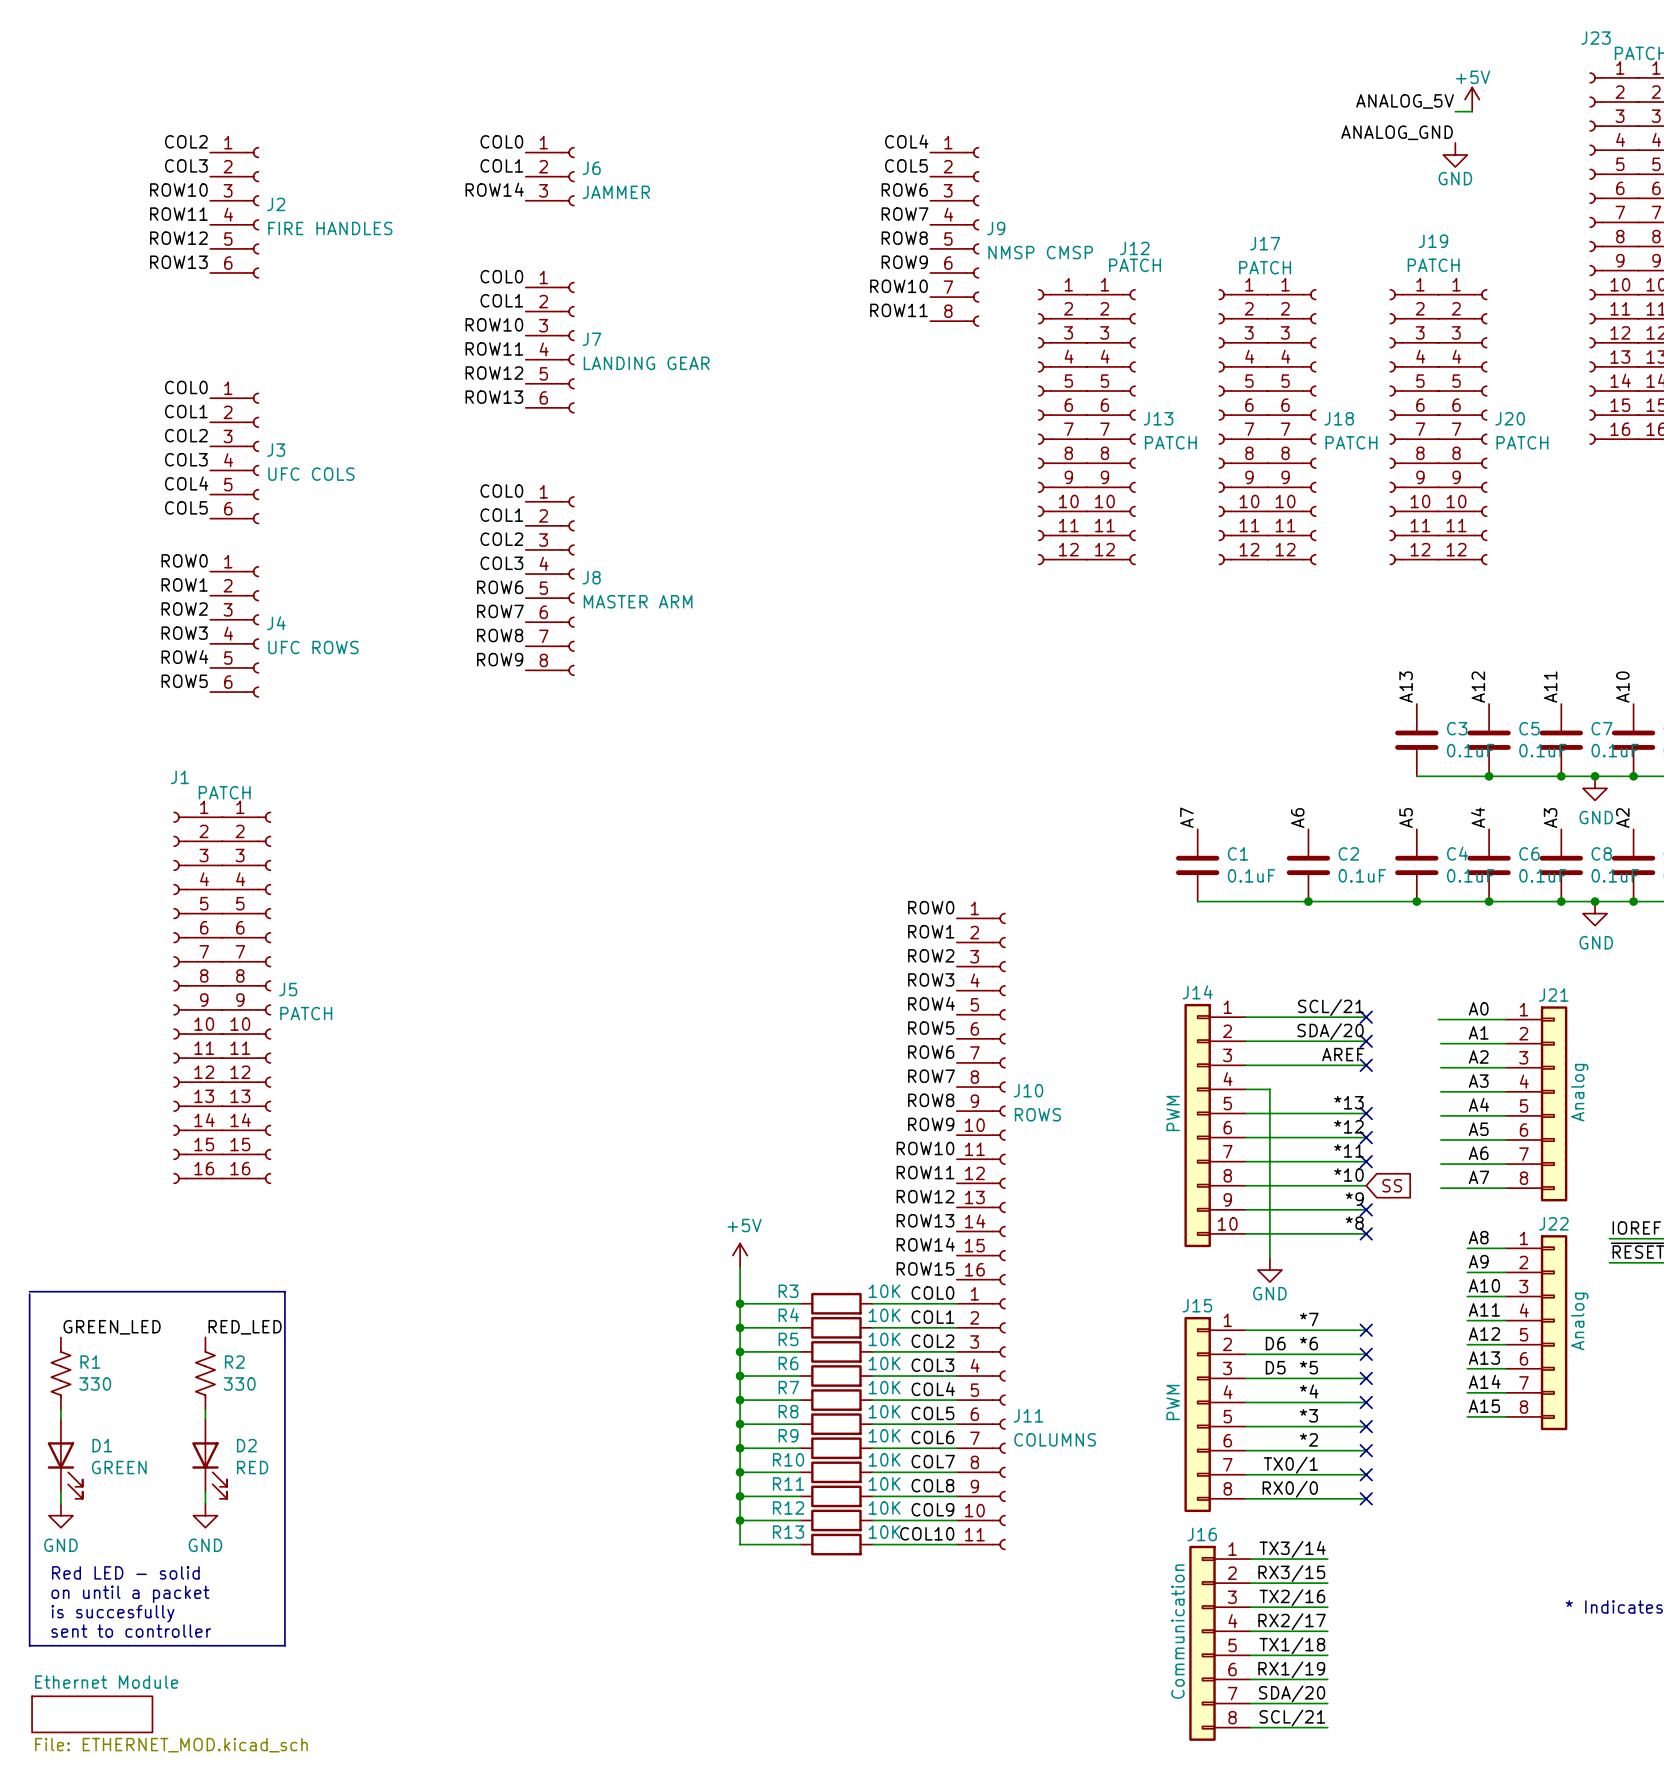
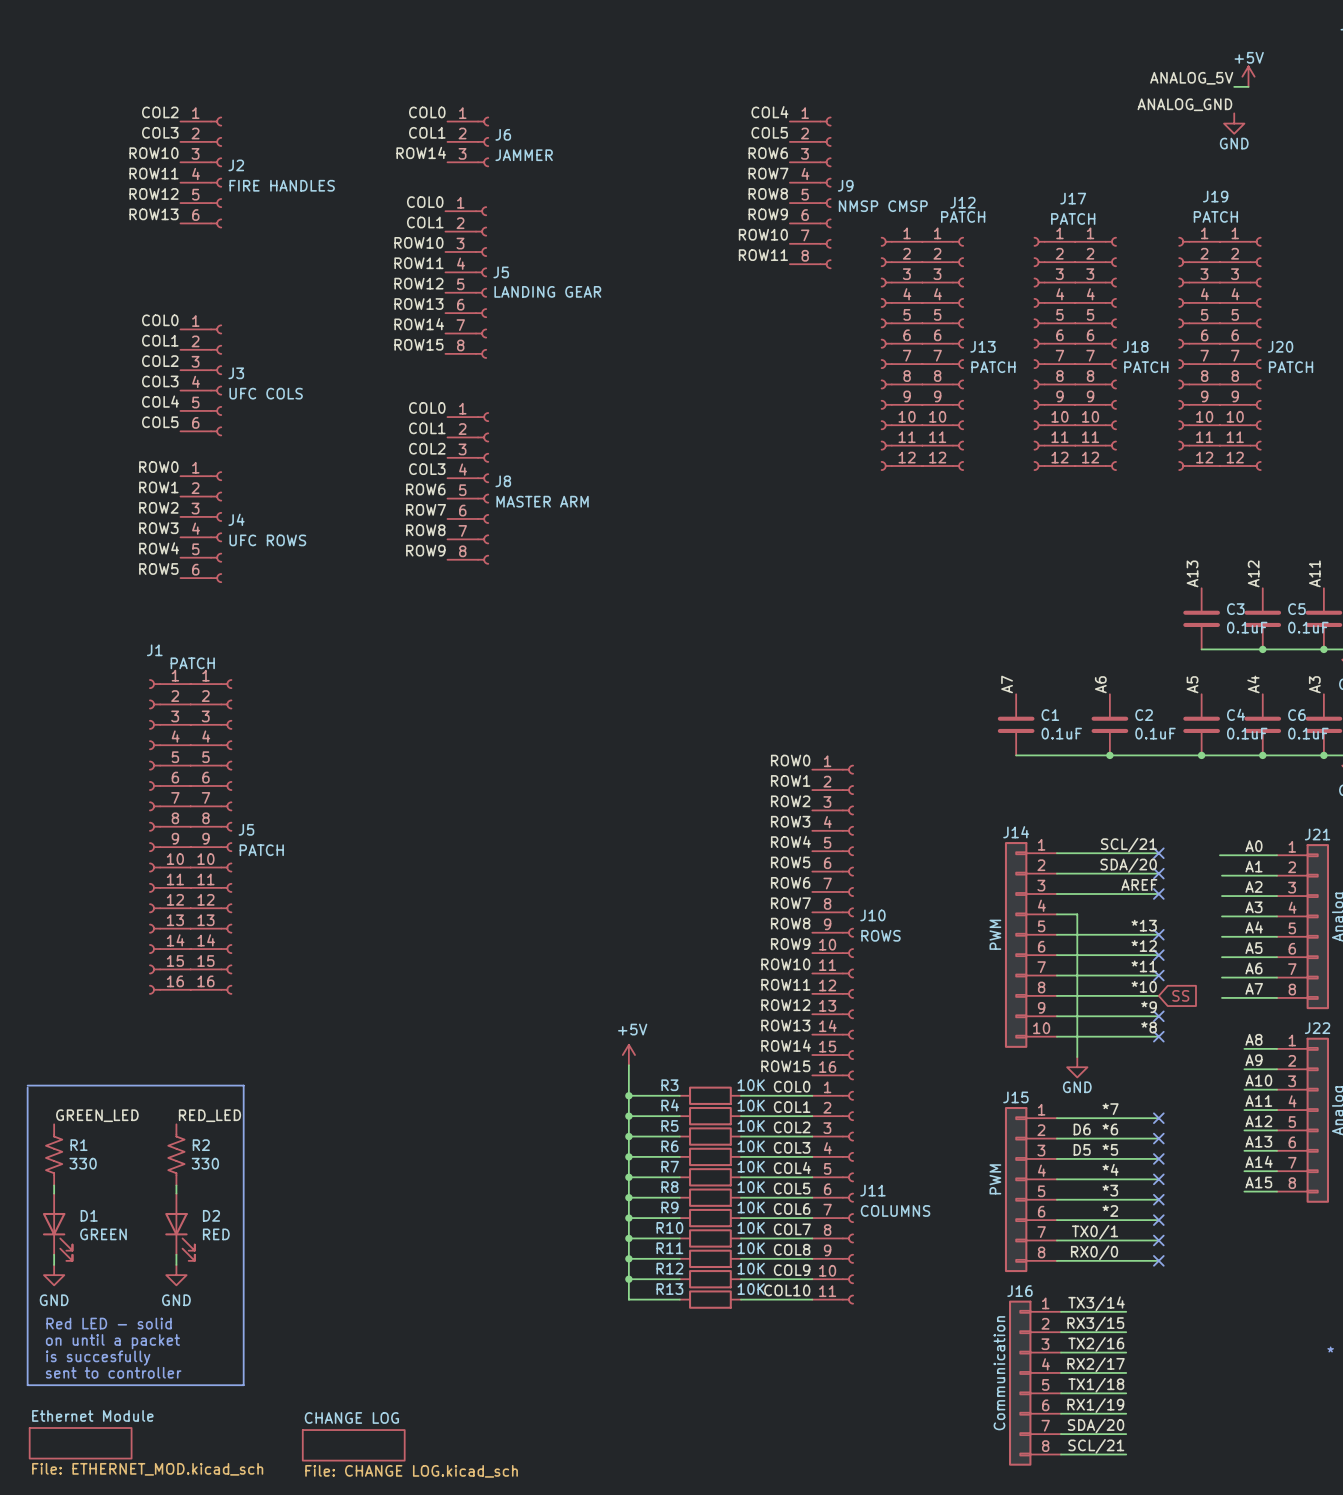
label: none -> COL0 (425, 202)
label: COL0 (501, 276) -> COL1 (425, 222)
label: COL1 (501, 300) -> ROW10 (418, 242)
label: ROW10 (494, 324) -> ROW11 (418, 263)
J5: none -> LANDING GEAR (466, 282)
J7: LANDING GEAR (550, 347) -> none
label: ROW11 (494, 348) -> ROW12 (418, 283)
label: ROW12 (494, 373) -> ROW13 (418, 304)
label: ROW13 (494, 397) -> ROW14 (419, 324)
label: none -> ROW15 (418, 344)
sheet CHANGE LOG: none -> File: CHANGE LOG.kicad_sch (353, 1445)

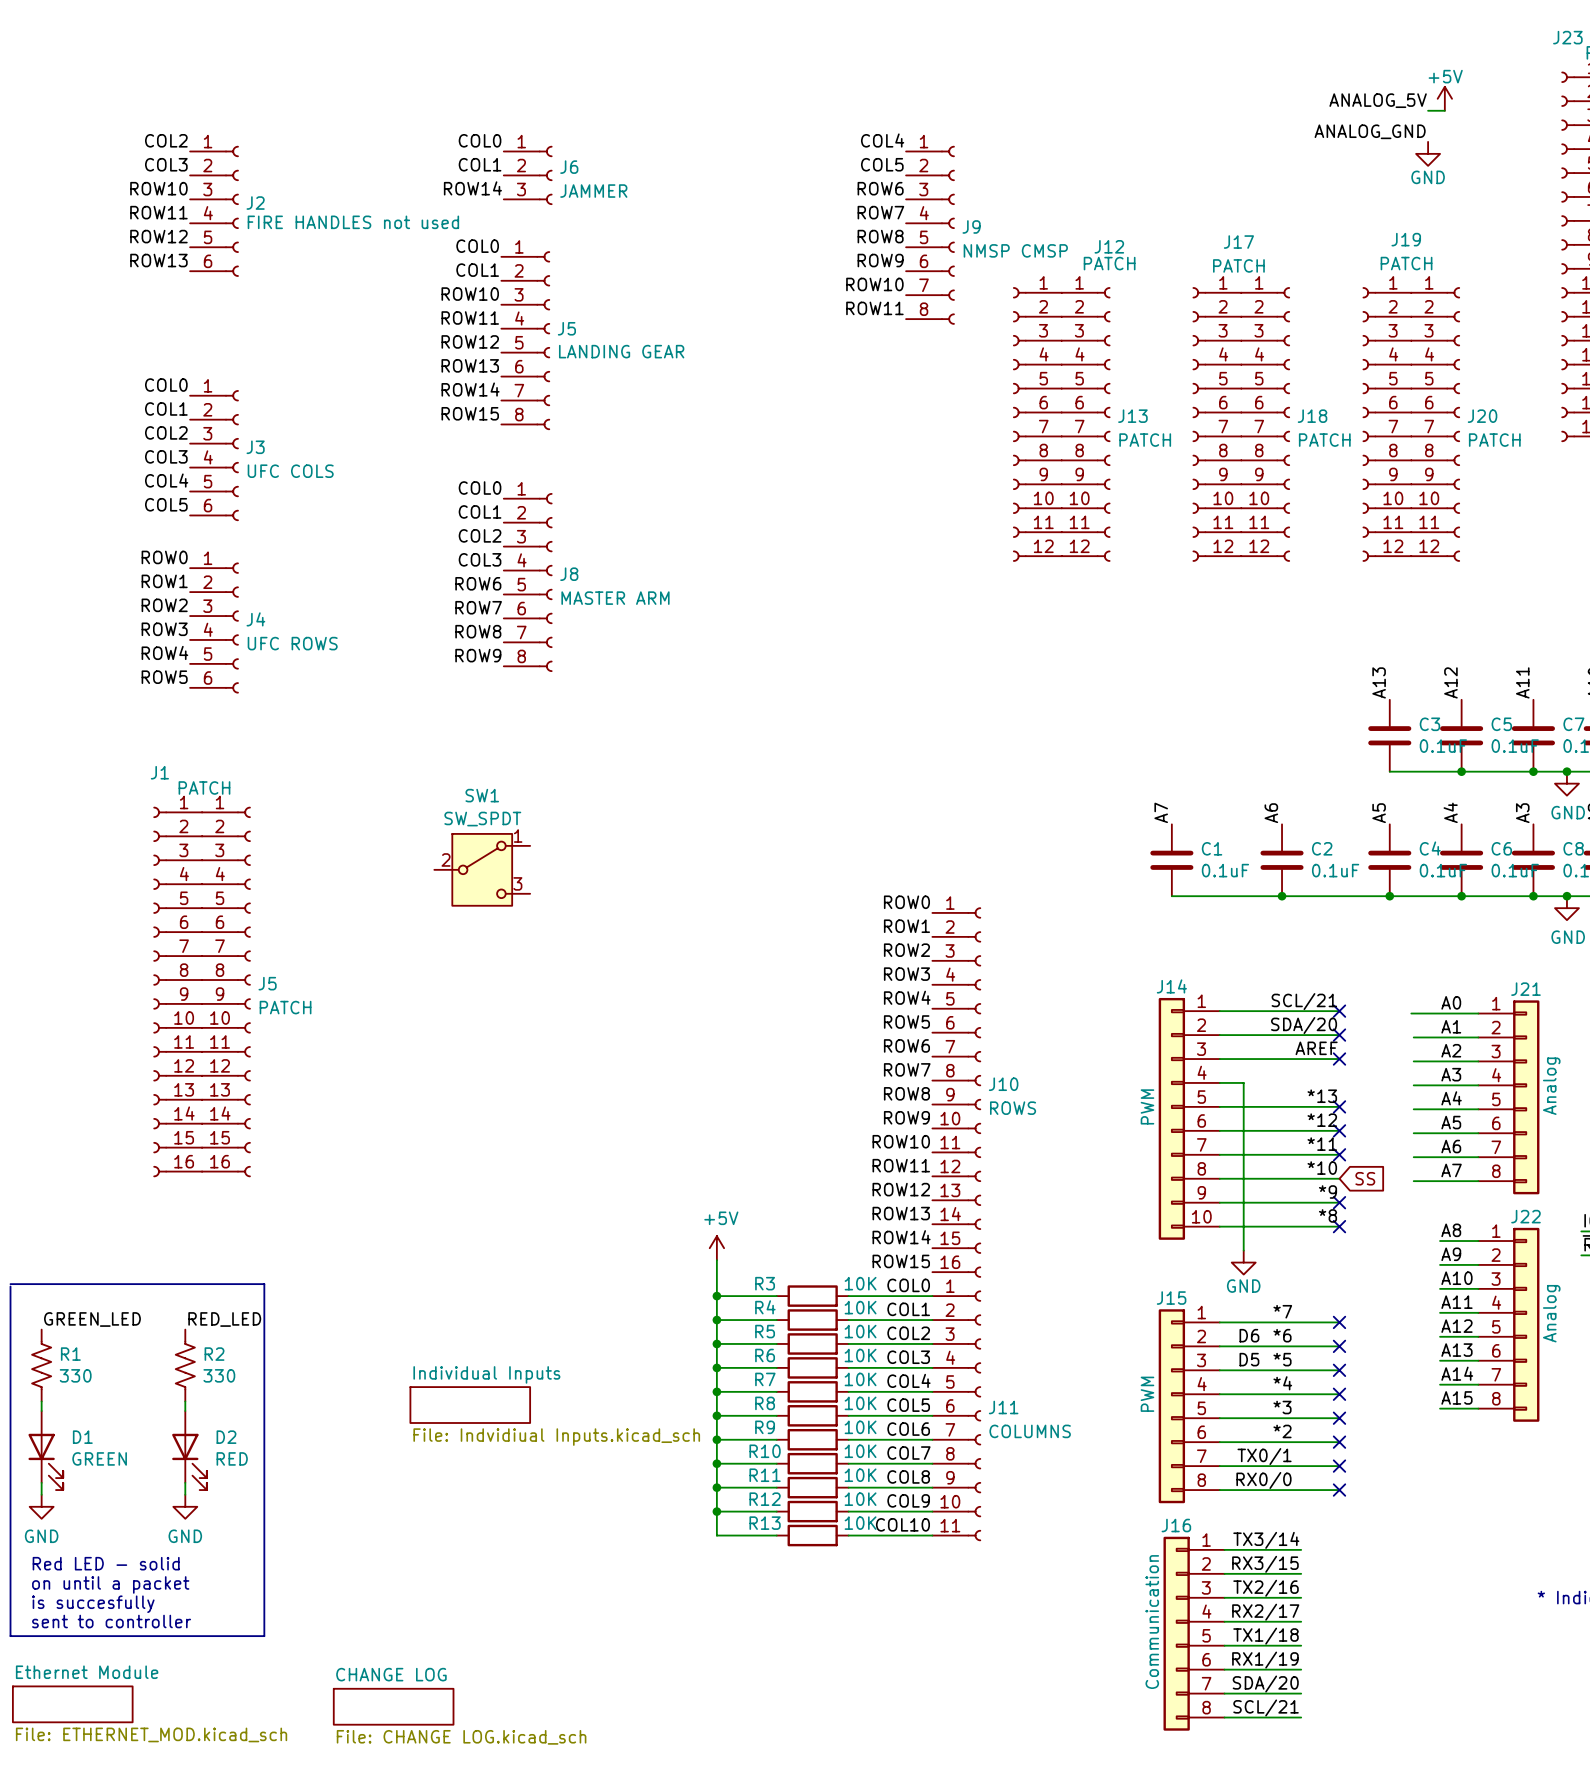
J2 value: FIRE HANDLES (282, 185) -> FIRE HANDLES not used (353, 222)
SW1: none -> SW_SPDT (482, 869)
sheet Individual Inputs: none -> File: Indvidiual Inputs.kicad_sch (470, 1405)

